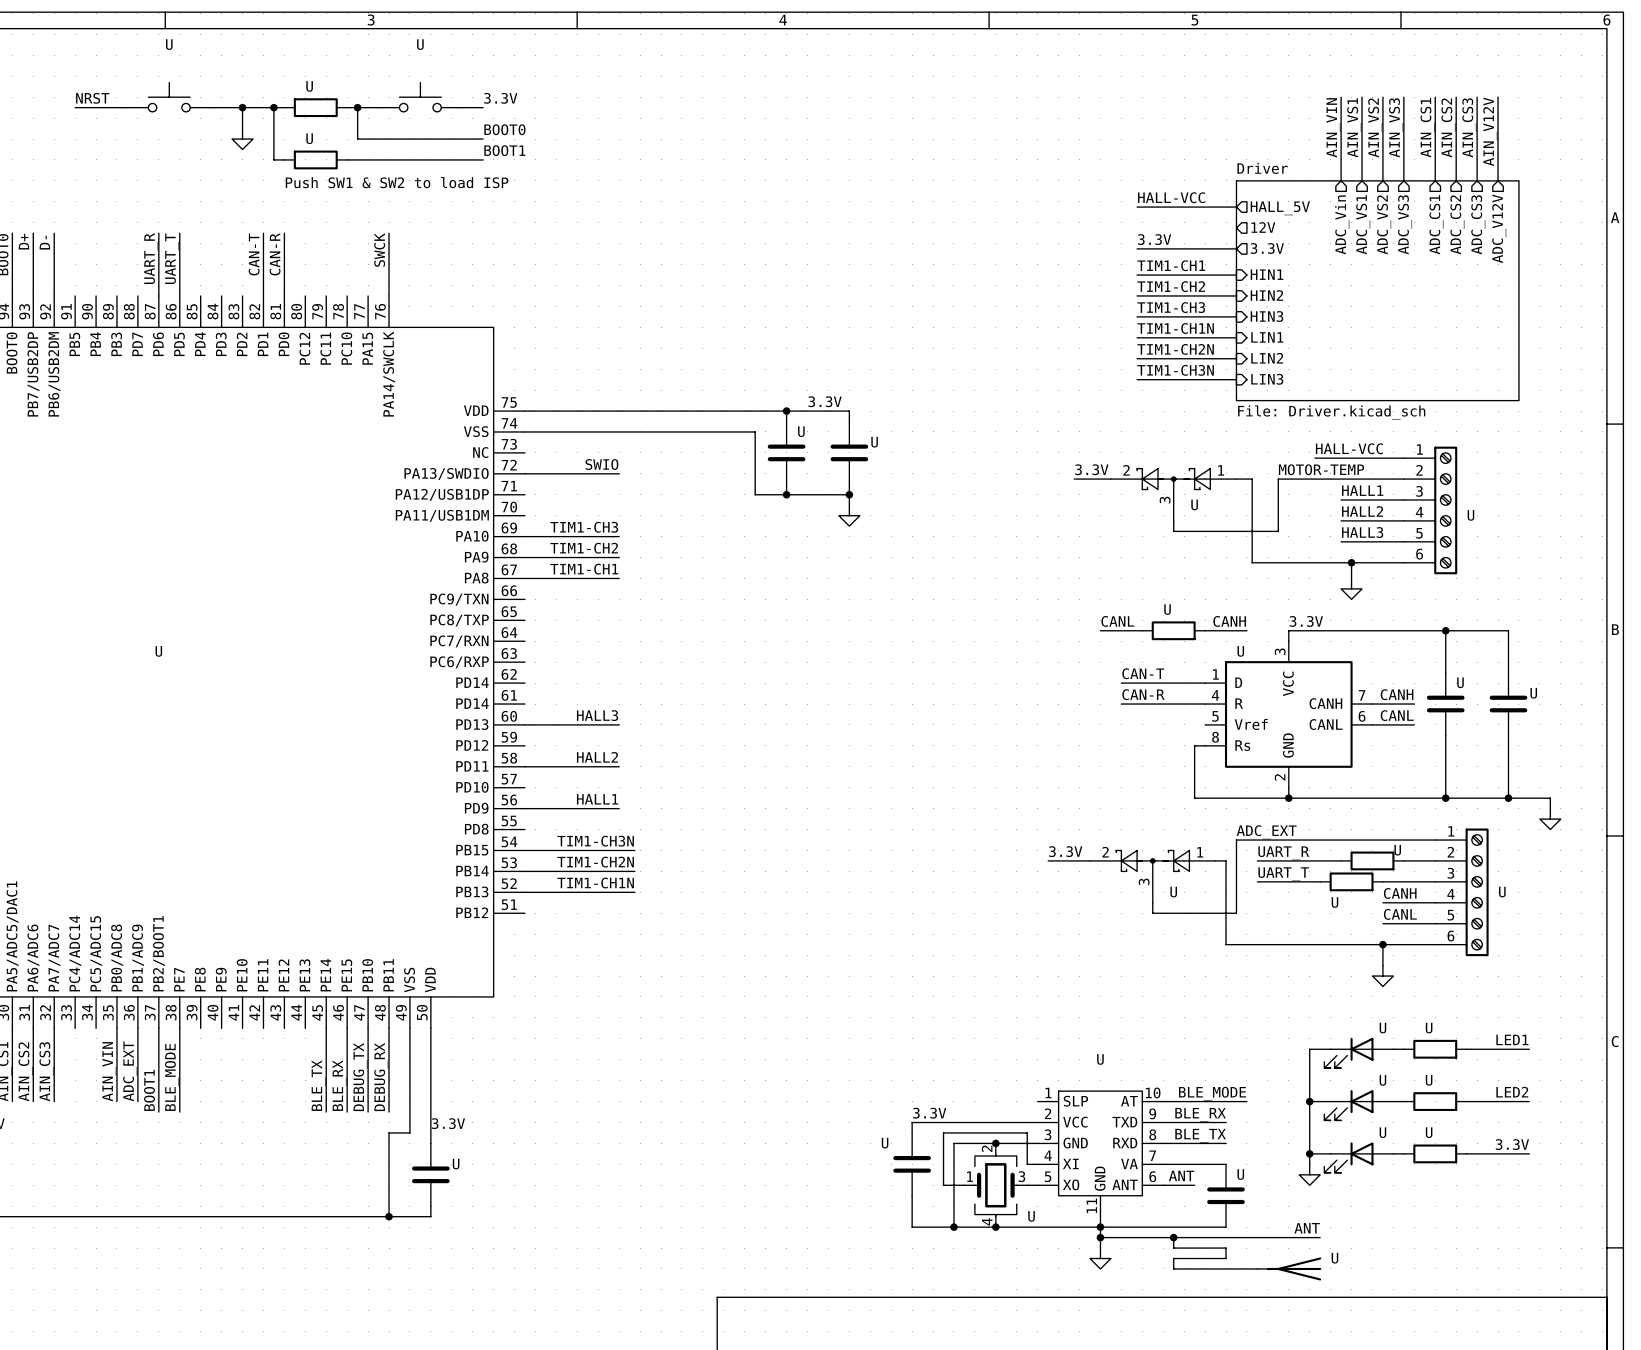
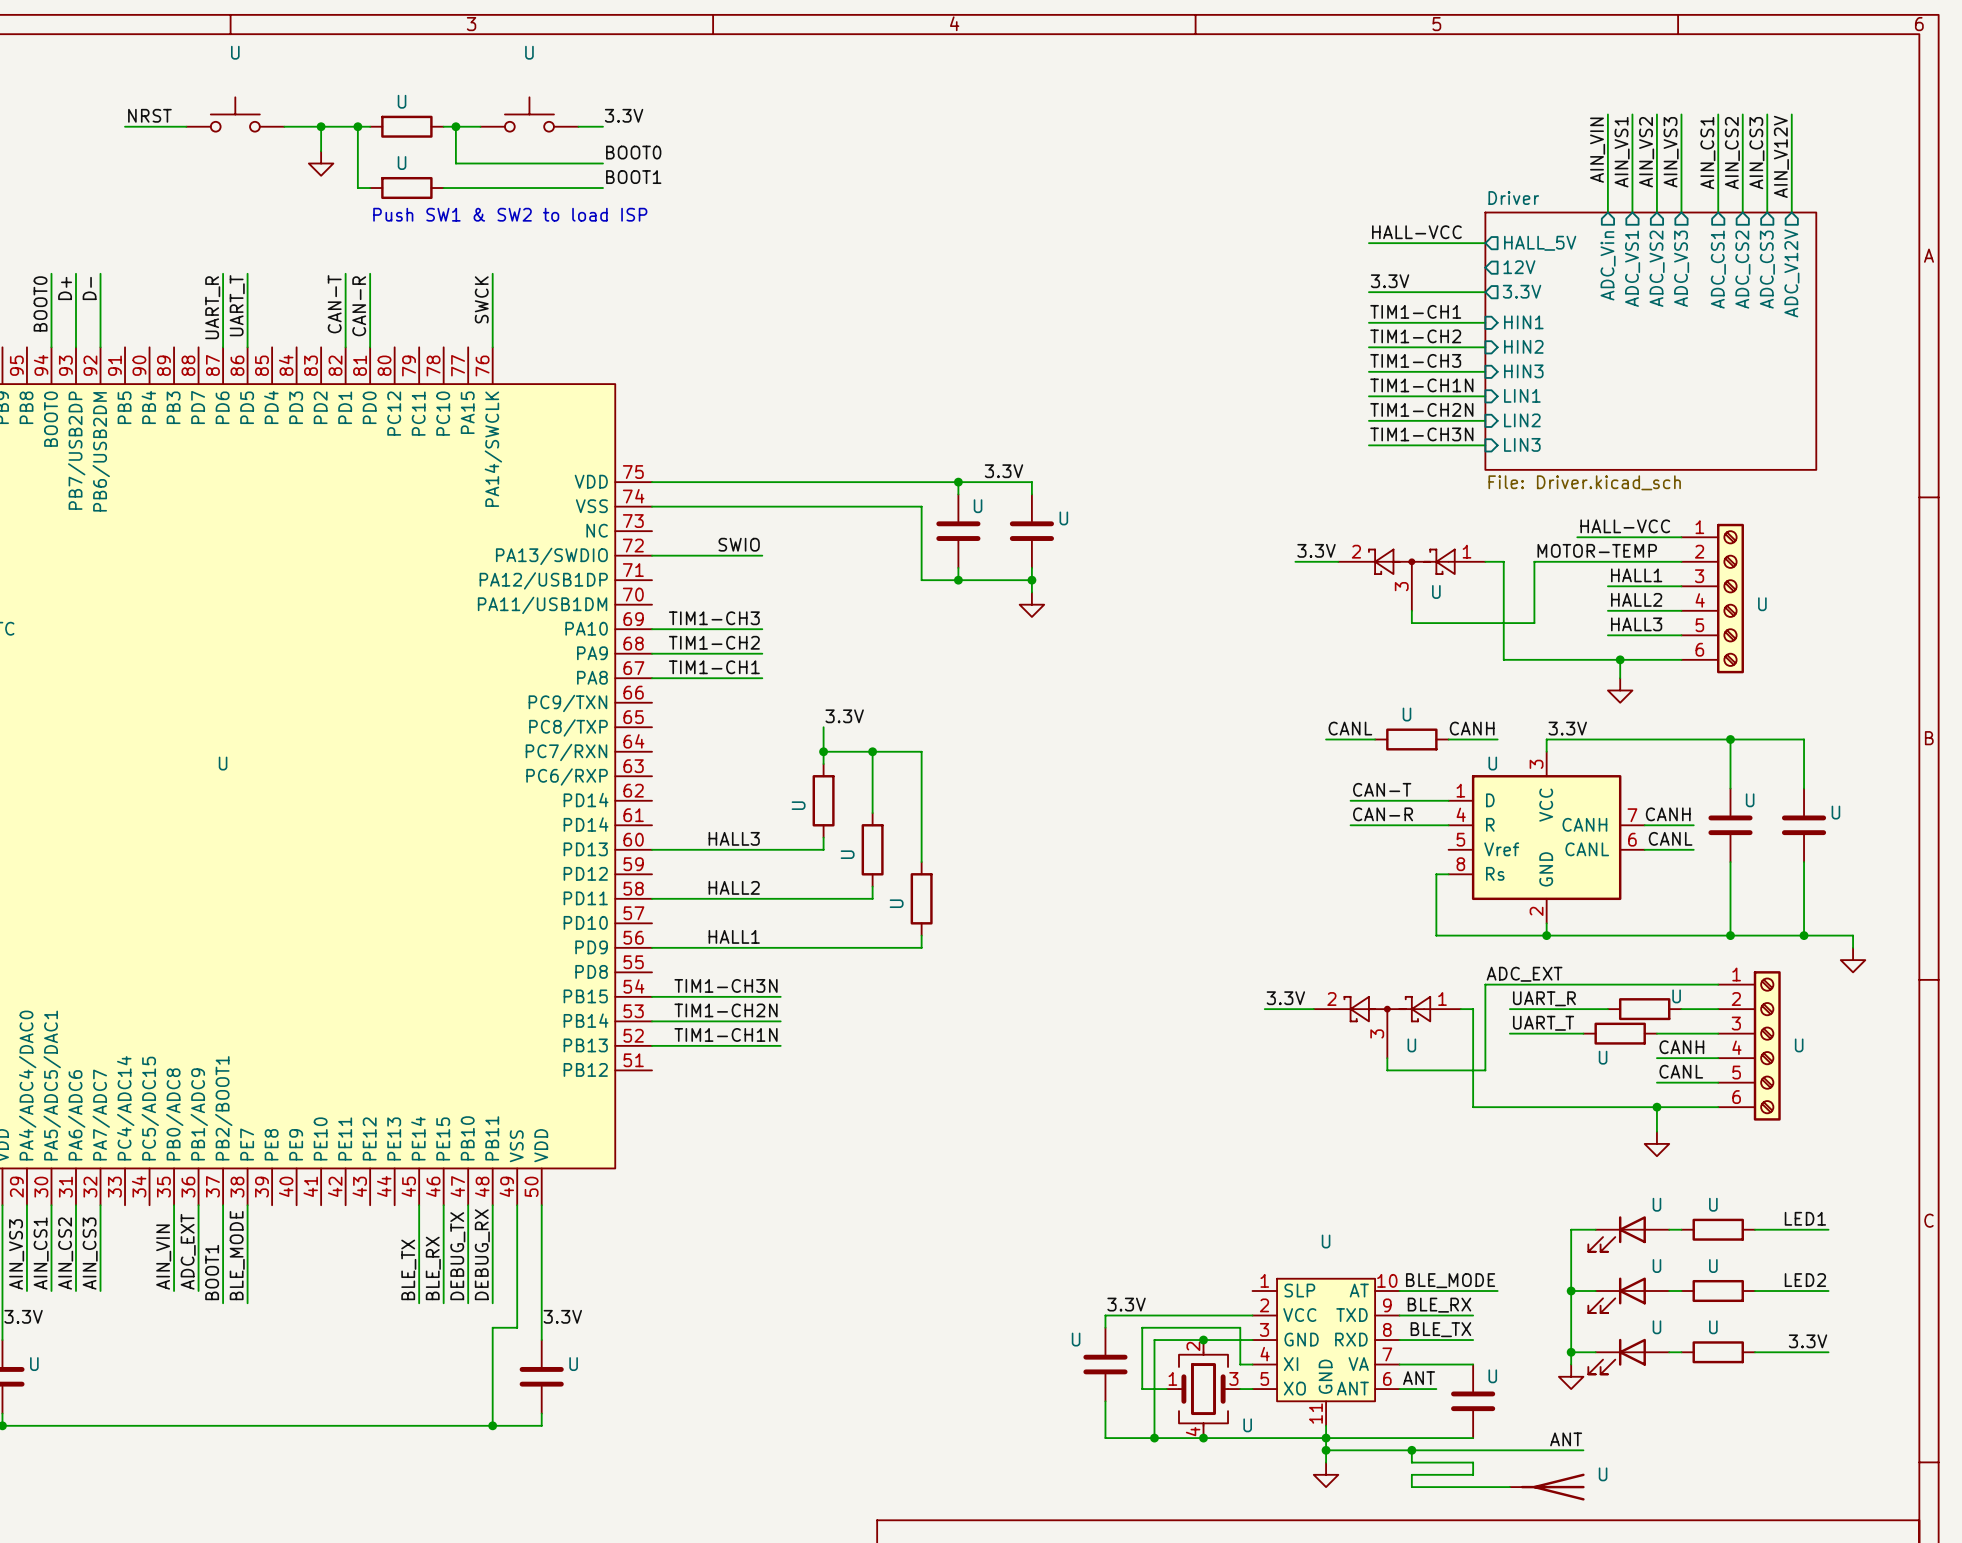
label: none -> 3.3V (844, 716)
wire: none -> (823, 727) (823, 764)
wire: none -> (823, 751) (921, 751) (921, 862)
junction: none -> (823, 751)
wire: none -> (872, 751) (872, 813)
junction: none -> (872, 751)
U: none -> (823, 800)
wire: none -> (823, 837) (823, 849) (762, 849)
U: none -> (872, 849)
wire: none -> (872, 886) (872, 898) (762, 898)
U: none -> (921, 898)
wire: none -> (921, 935) (921, 947) (762, 947)

